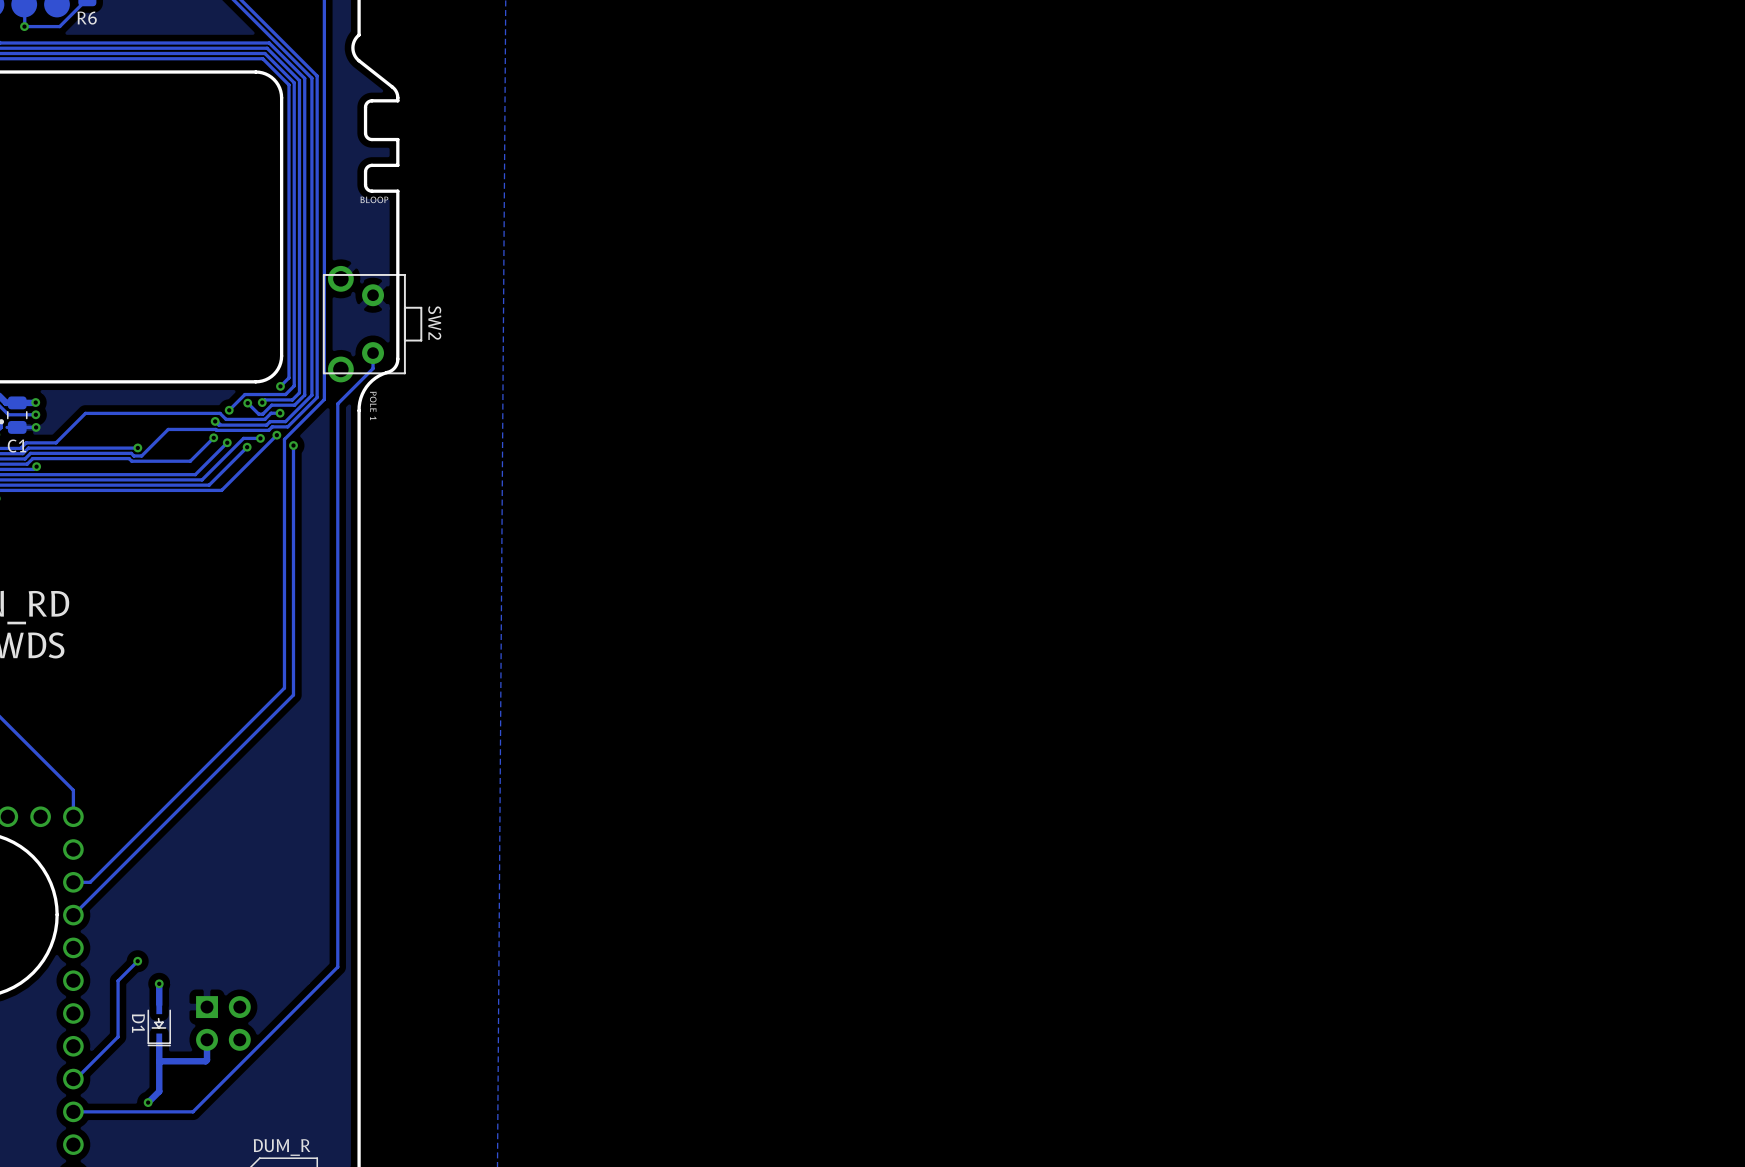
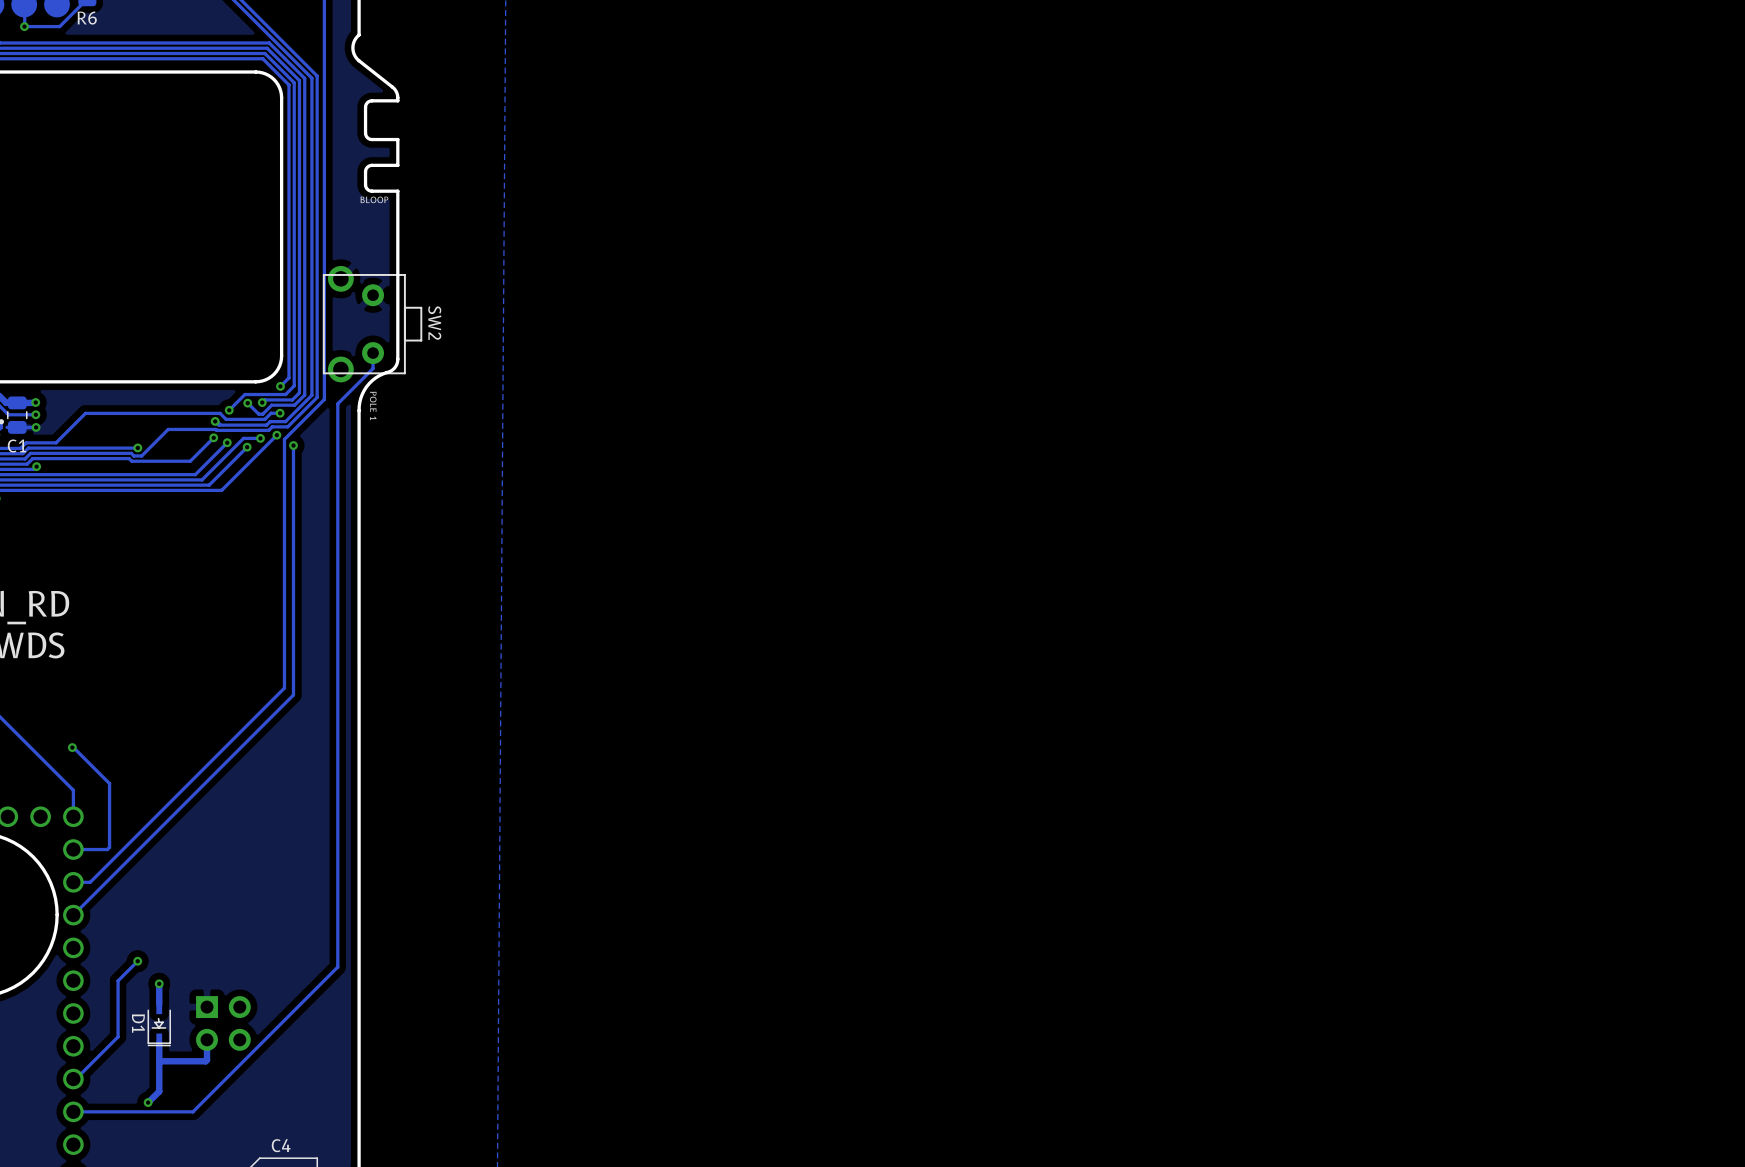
track: none -> (72, 747) (109, 783) (109, 847) (107, 849) (73, 849)
via: none -> (72, 747)
DUM_R name: DUM_R (282, 1147) -> C4 (281, 1145)

